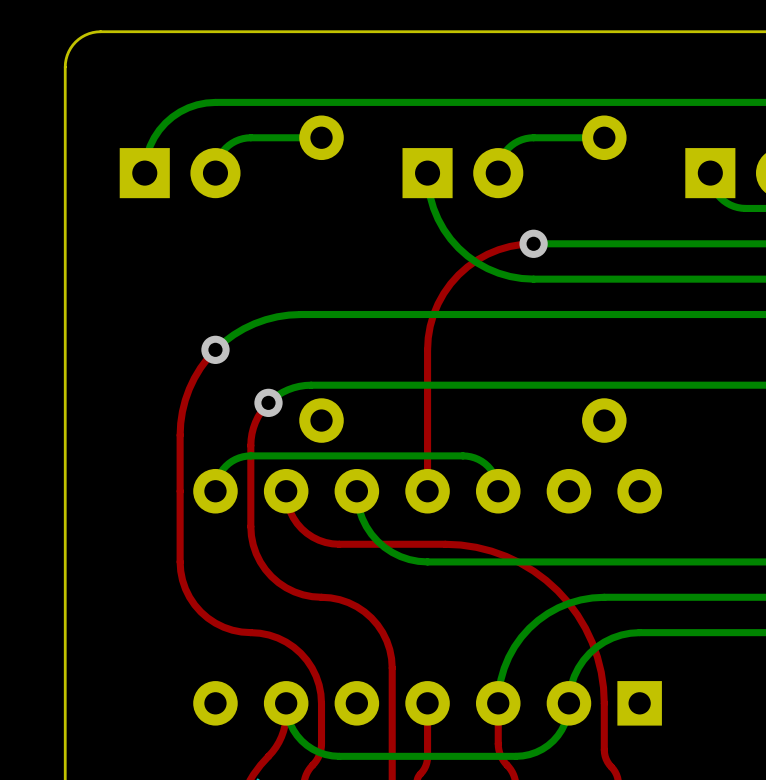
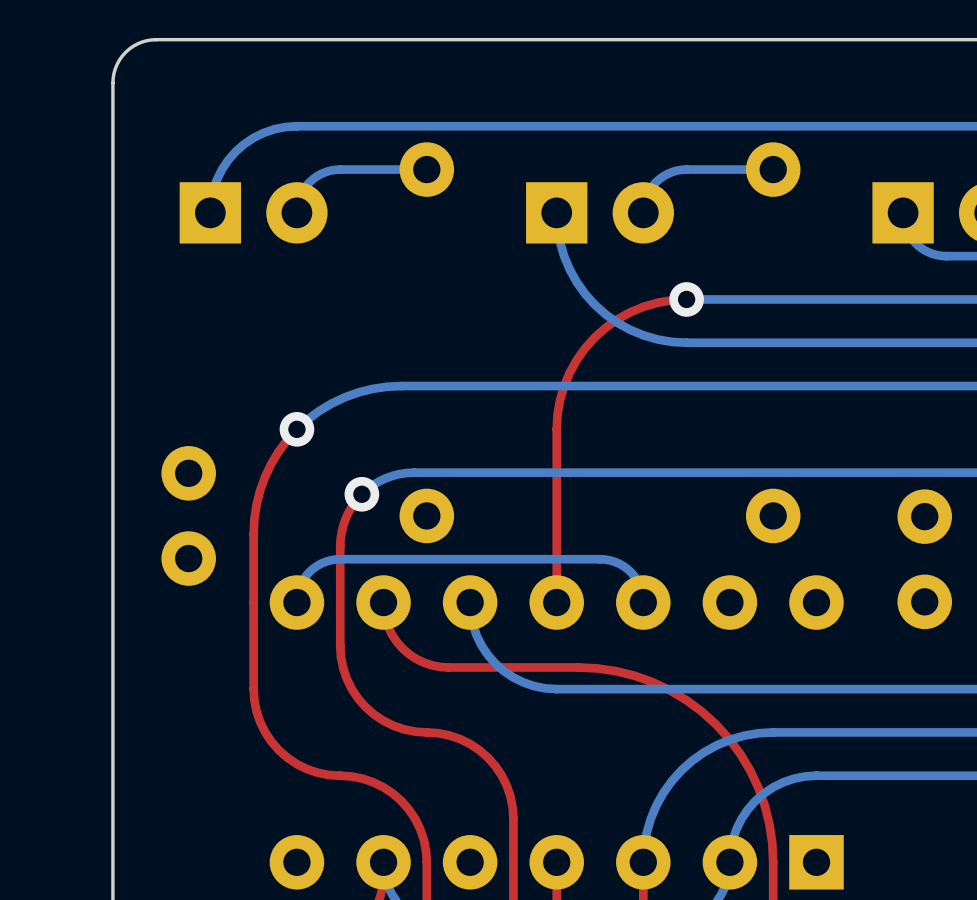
part: none -> (188, 515)
part: none -> (924, 559)

